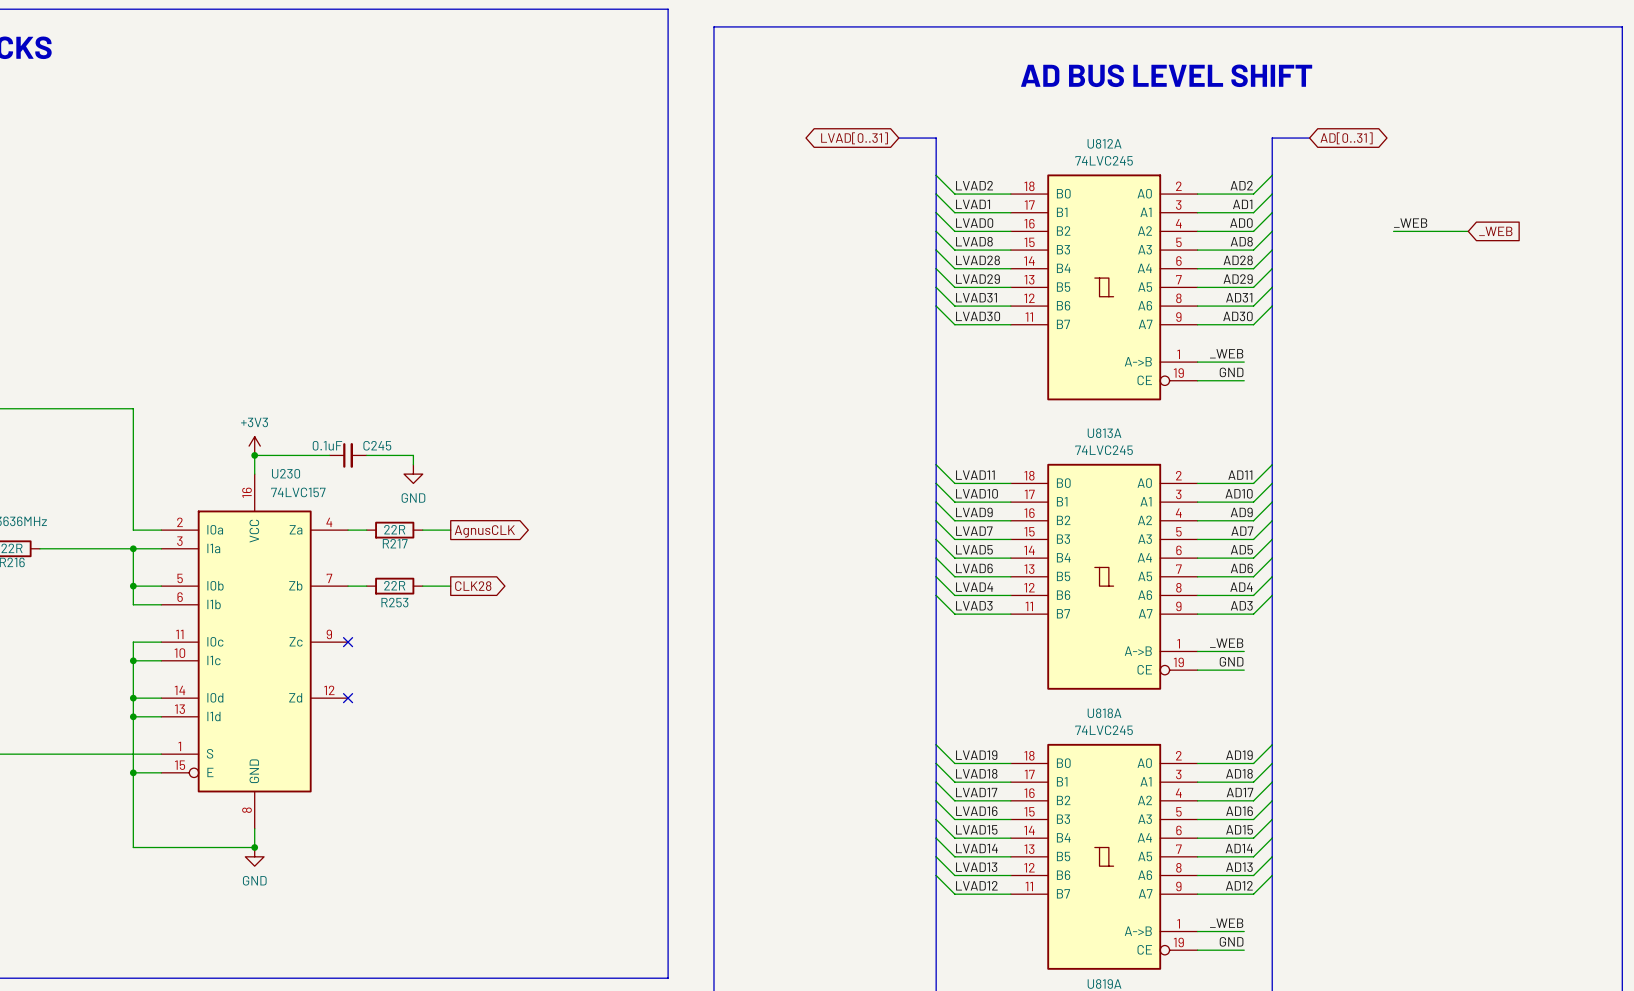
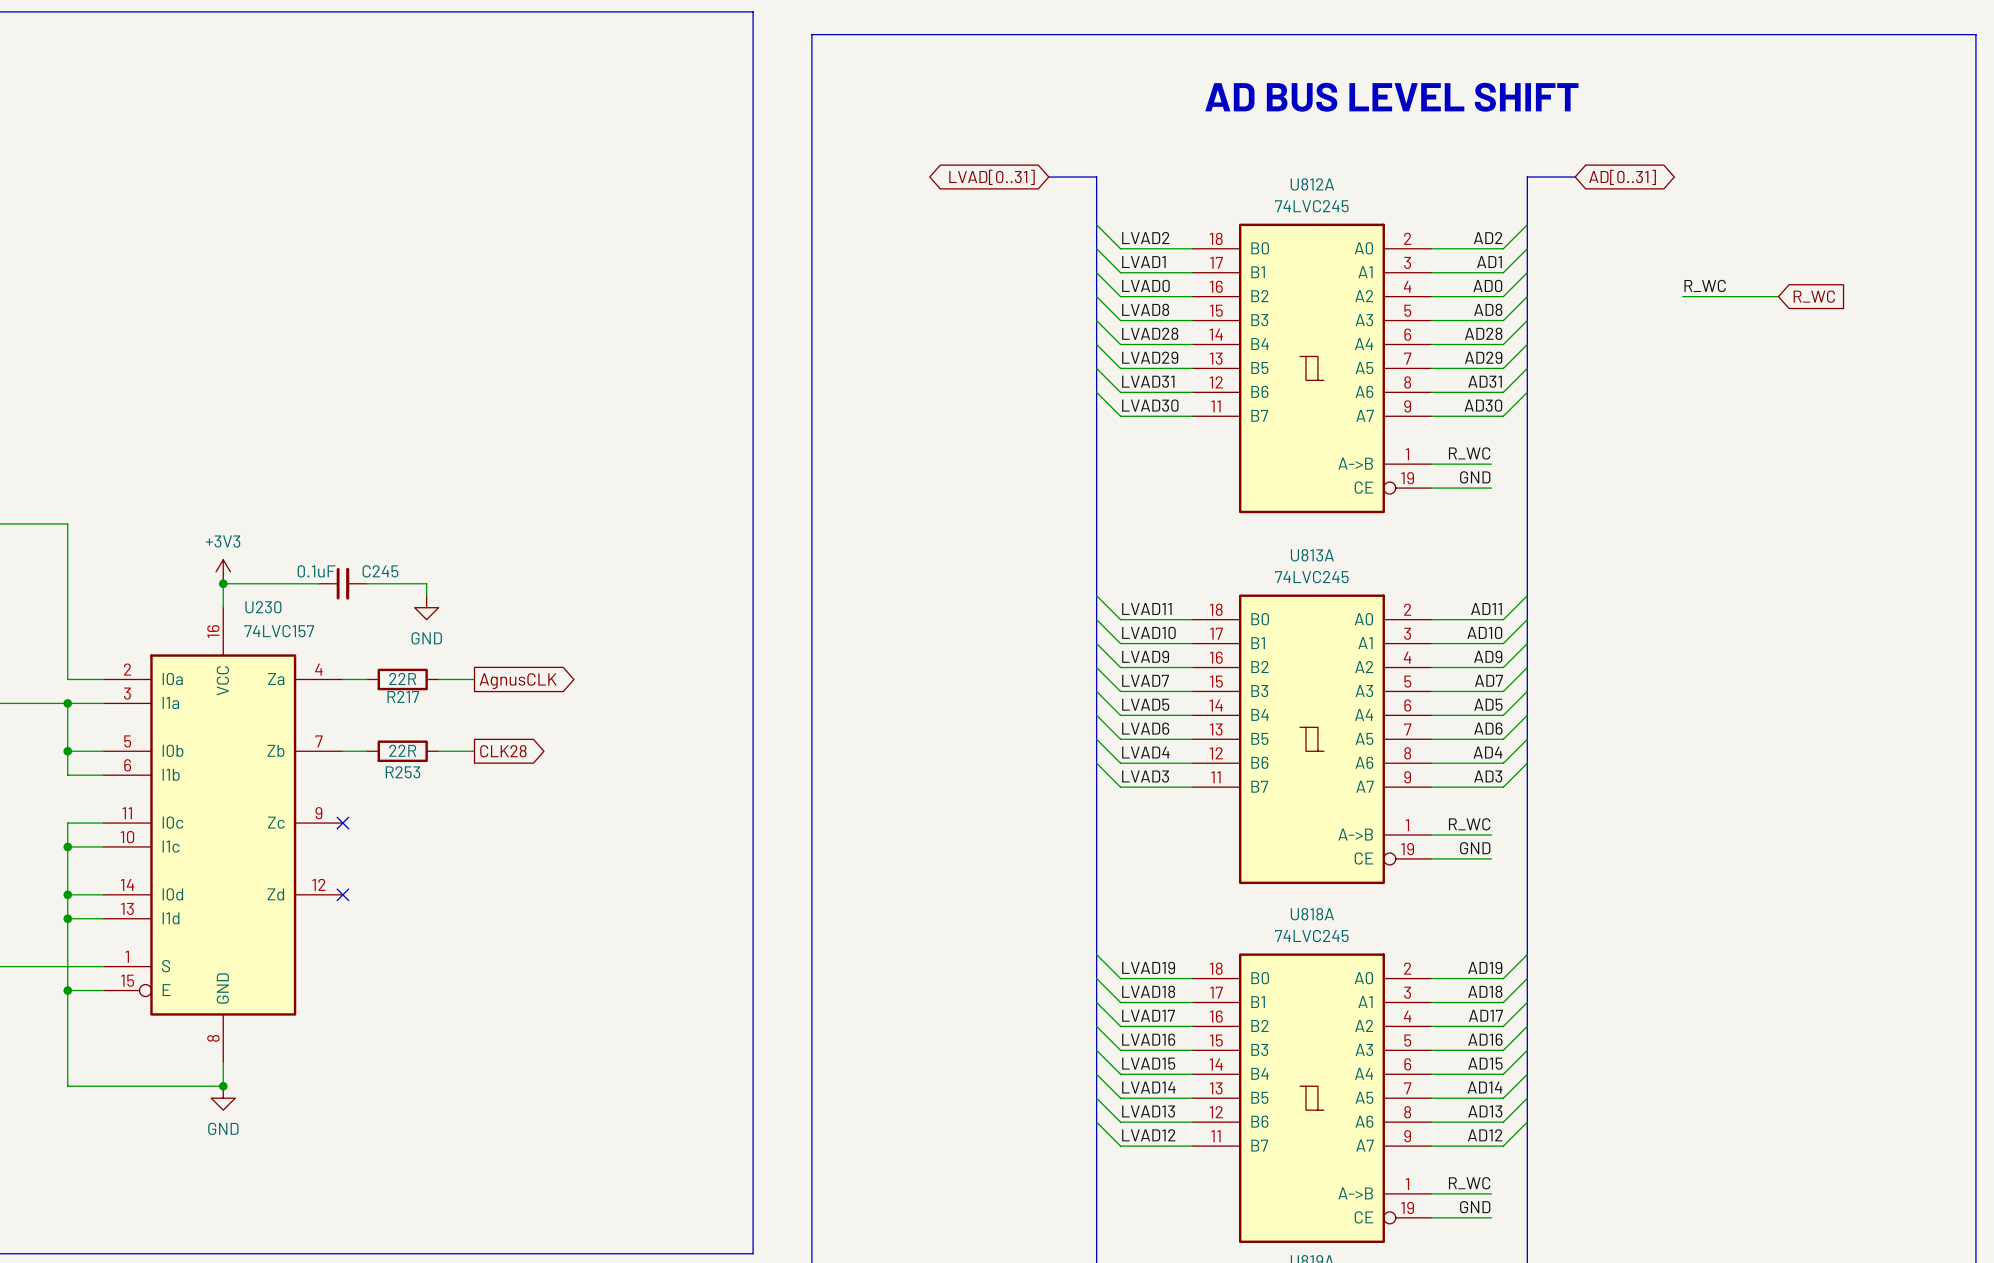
label: _WEB (1410, 223) -> R_WC (1705, 285)
global label: _WEB (1495, 231) -> R_WC (1814, 296)
label: _WEB (1226, 353) -> R_WC (1469, 453)
label: _WEB (1226, 643) -> R_WC (1469, 824)
label: _WEB (1226, 923) -> R_WC (1469, 1183)

